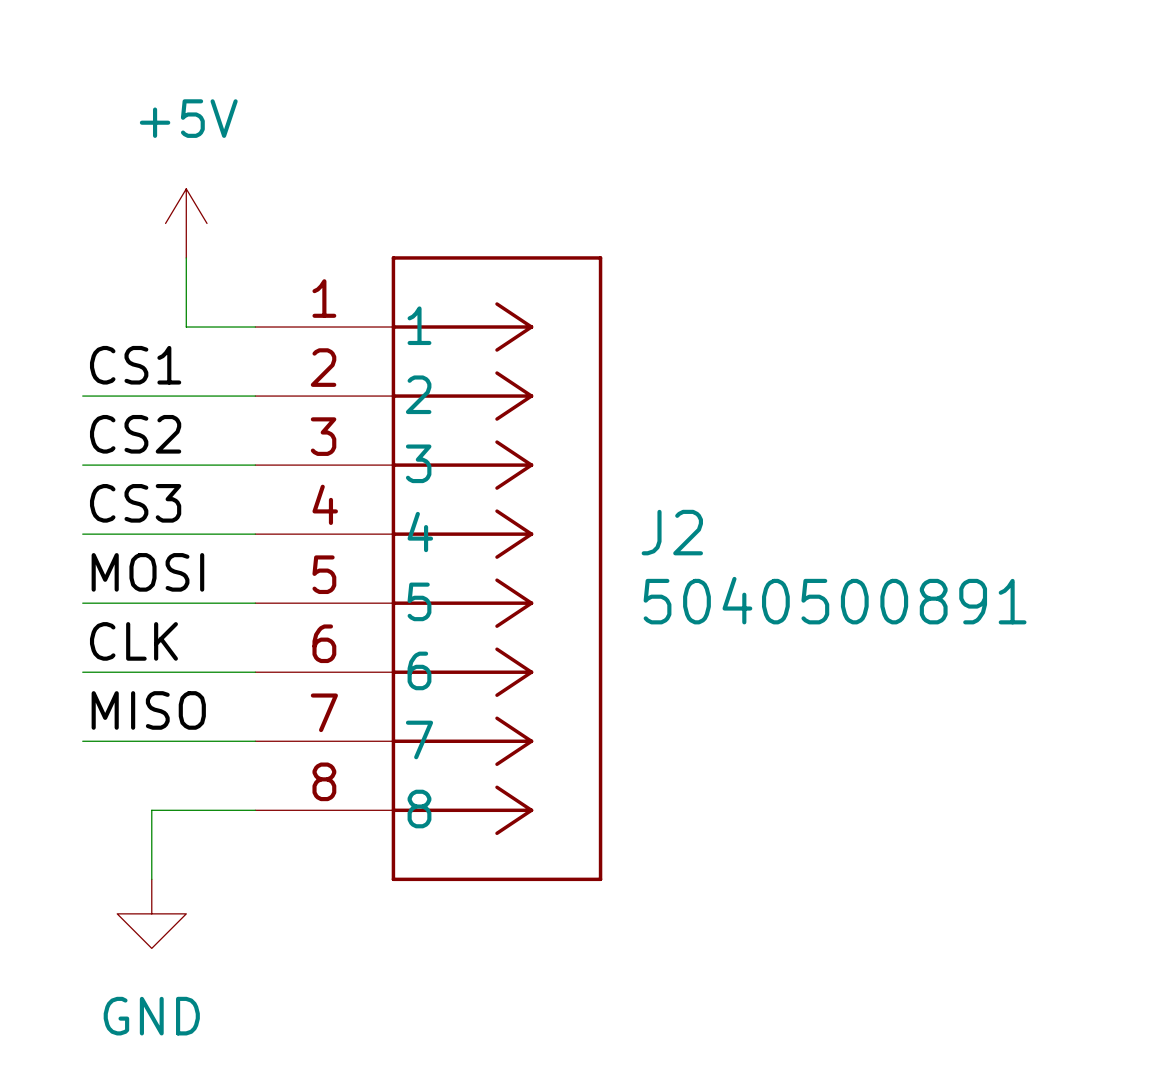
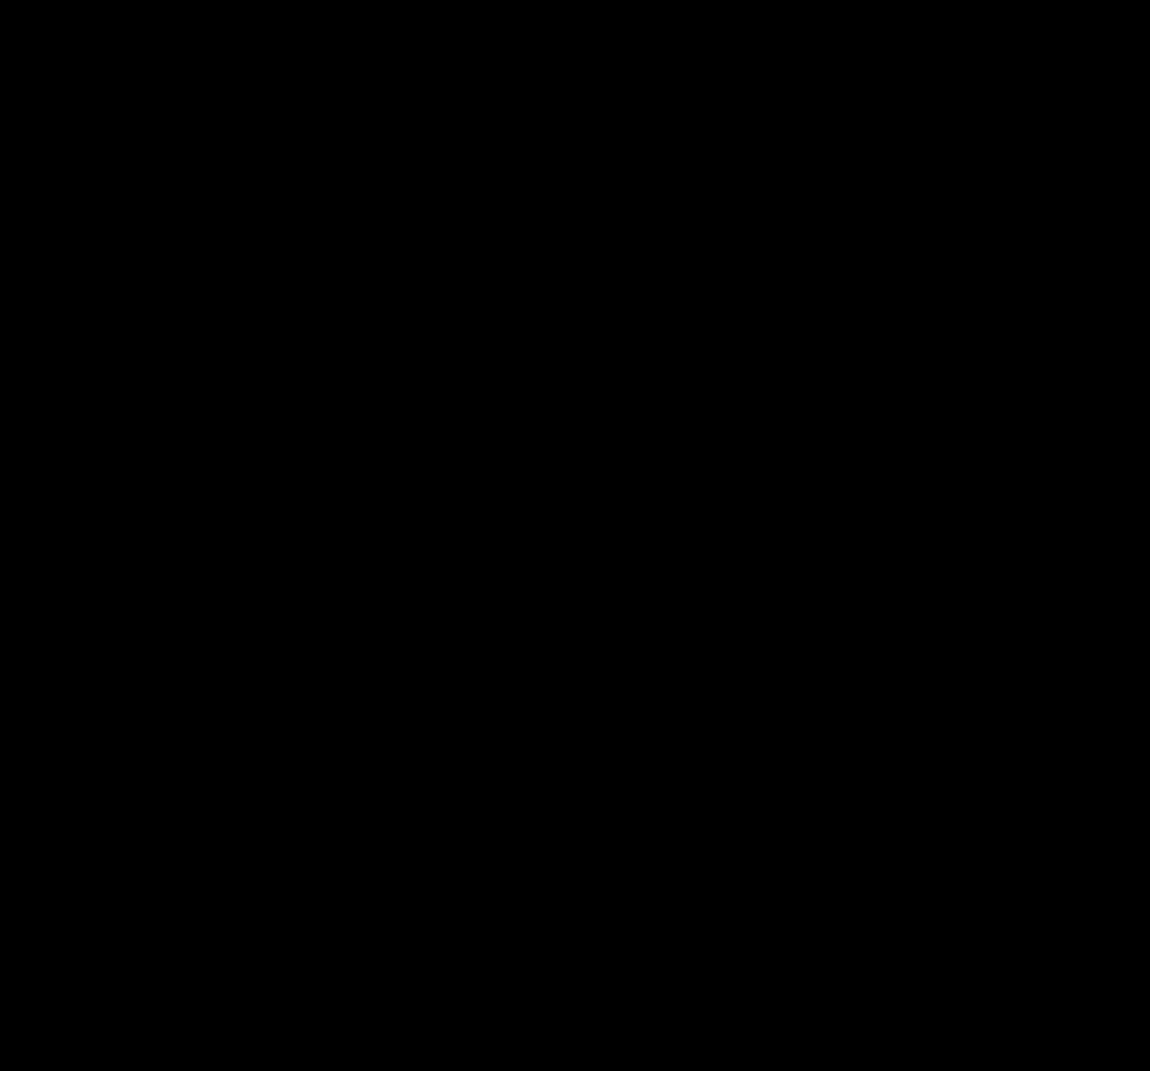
power symbol: +5V (186, 223) -> none
wire: (186, 257) (186, 327) (255, 327) -> none
label: CS1 (135, 365) -> none
wire: (82, 396) (255, 396) -> none
label: CS2 (135, 434) -> none
wire: (82, 465) (255, 465) -> none
label: CS3 (135, 503) -> none
wire: (82, 534) (255, 534) -> none
J2: 5040500891 (428, 568) -> none
label: MOSI (147, 572) -> none
wire: (82, 603) (255, 603) -> none
label: CLK (133, 641) -> none
wire: (82, 672) (255, 672) -> none
label: MISO (148, 710) -> none
wire: (82, 741) (255, 741) -> none
wire: (255, 810) (151, 810) (151, 879) -> none
power symbol: GND (151, 913) -> none

